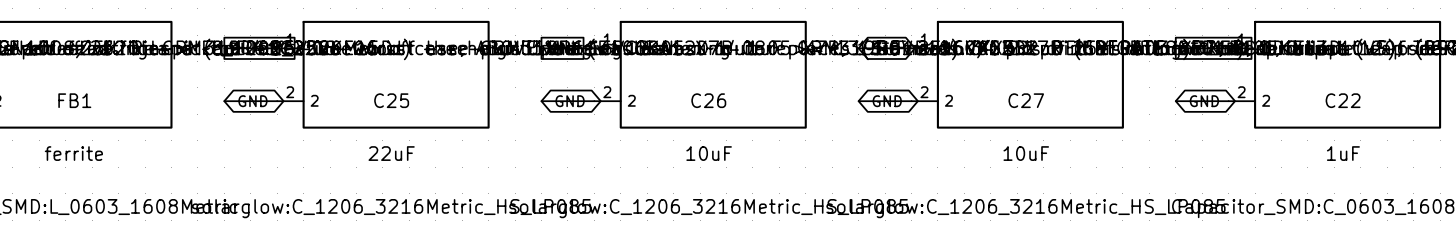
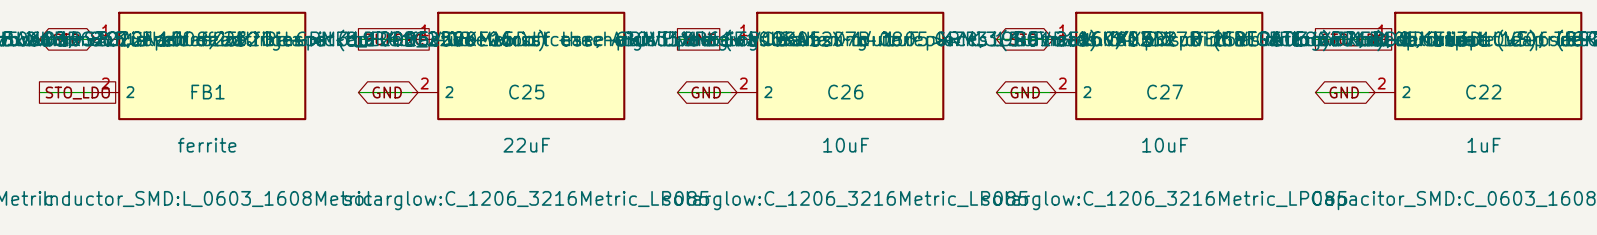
C25 text: solarglow:C_1206_3216Metric_HS_LP085 (391, 208) -> solarglow:C_1206_3216Metric_LP085 (526, 200)
C26 text: solarglow:C_1206_3216Metric_HS_LP085 (708, 208) -> solarglow:C_1206_3216Metric_LP085 (845, 200)
C27 text: solarglow:C_1206_3216Metric_HS_LP085 (1025, 208) -> solarglow:C_1206_3216Metric_LP085 (1164, 200)

